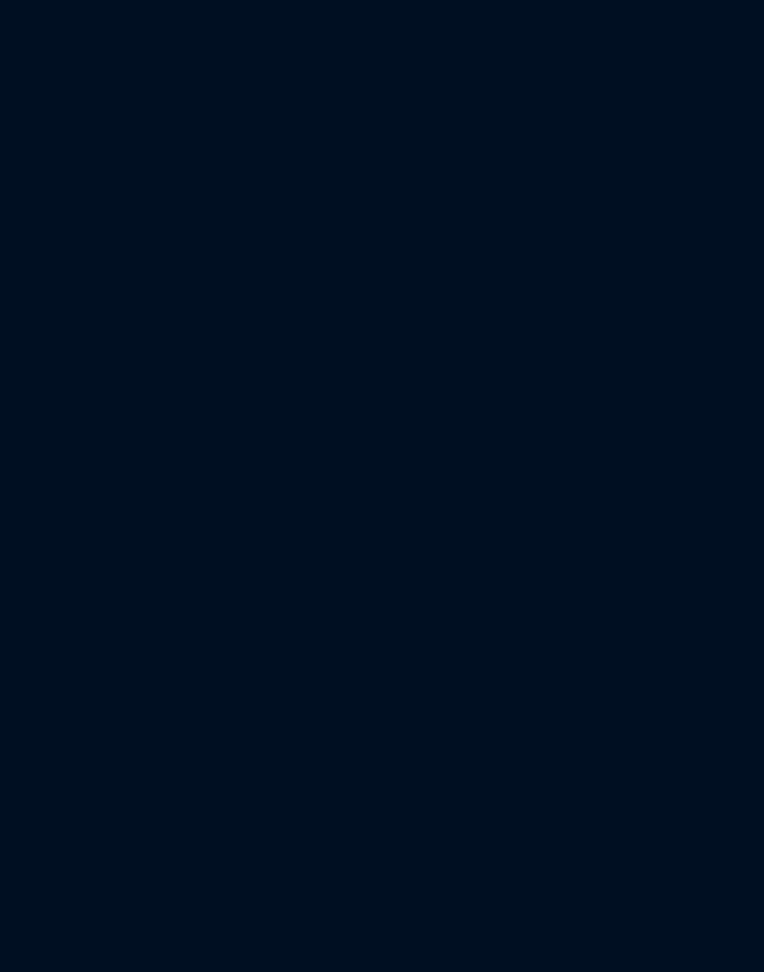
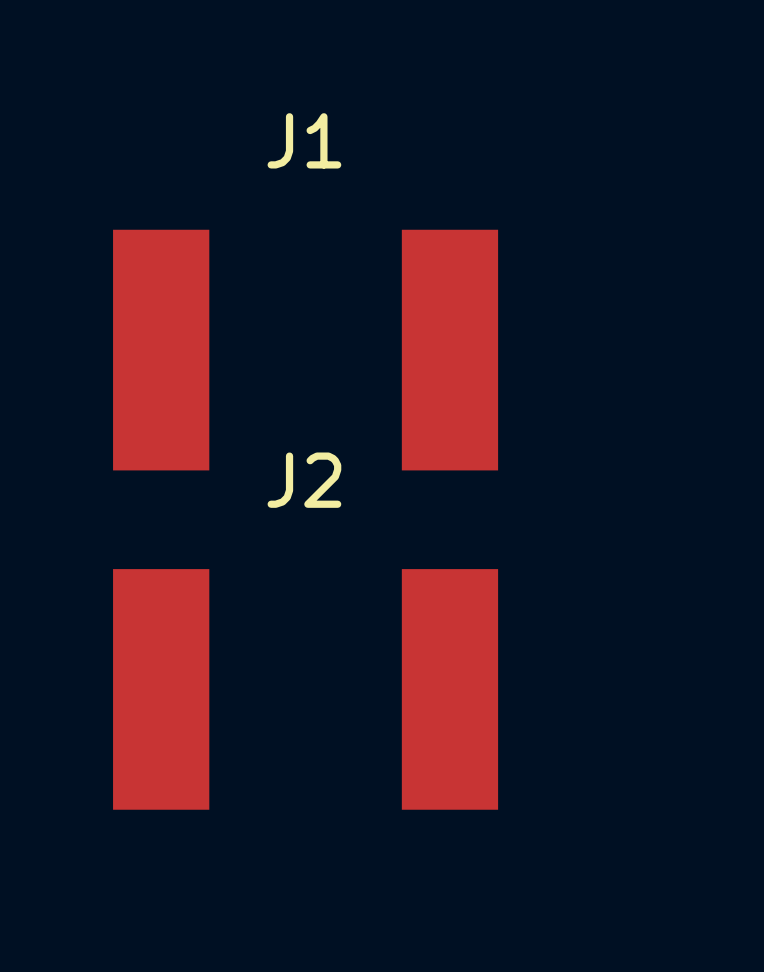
J1: none -> (305, 350)
J2: none -> (305, 689)

